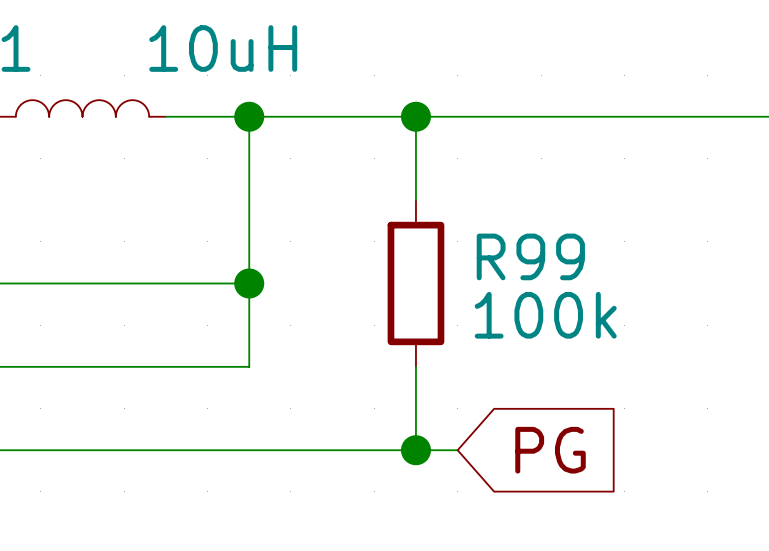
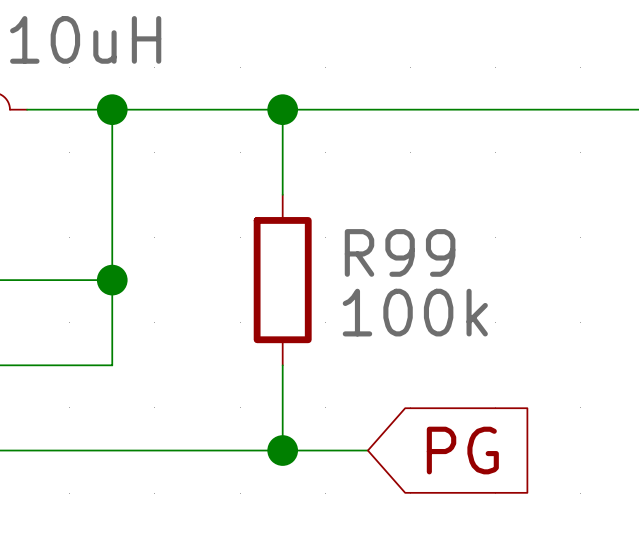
wire: none -> (325, 450) (367, 450)
global label position: PG (550, 450) -> PG (462, 450)

